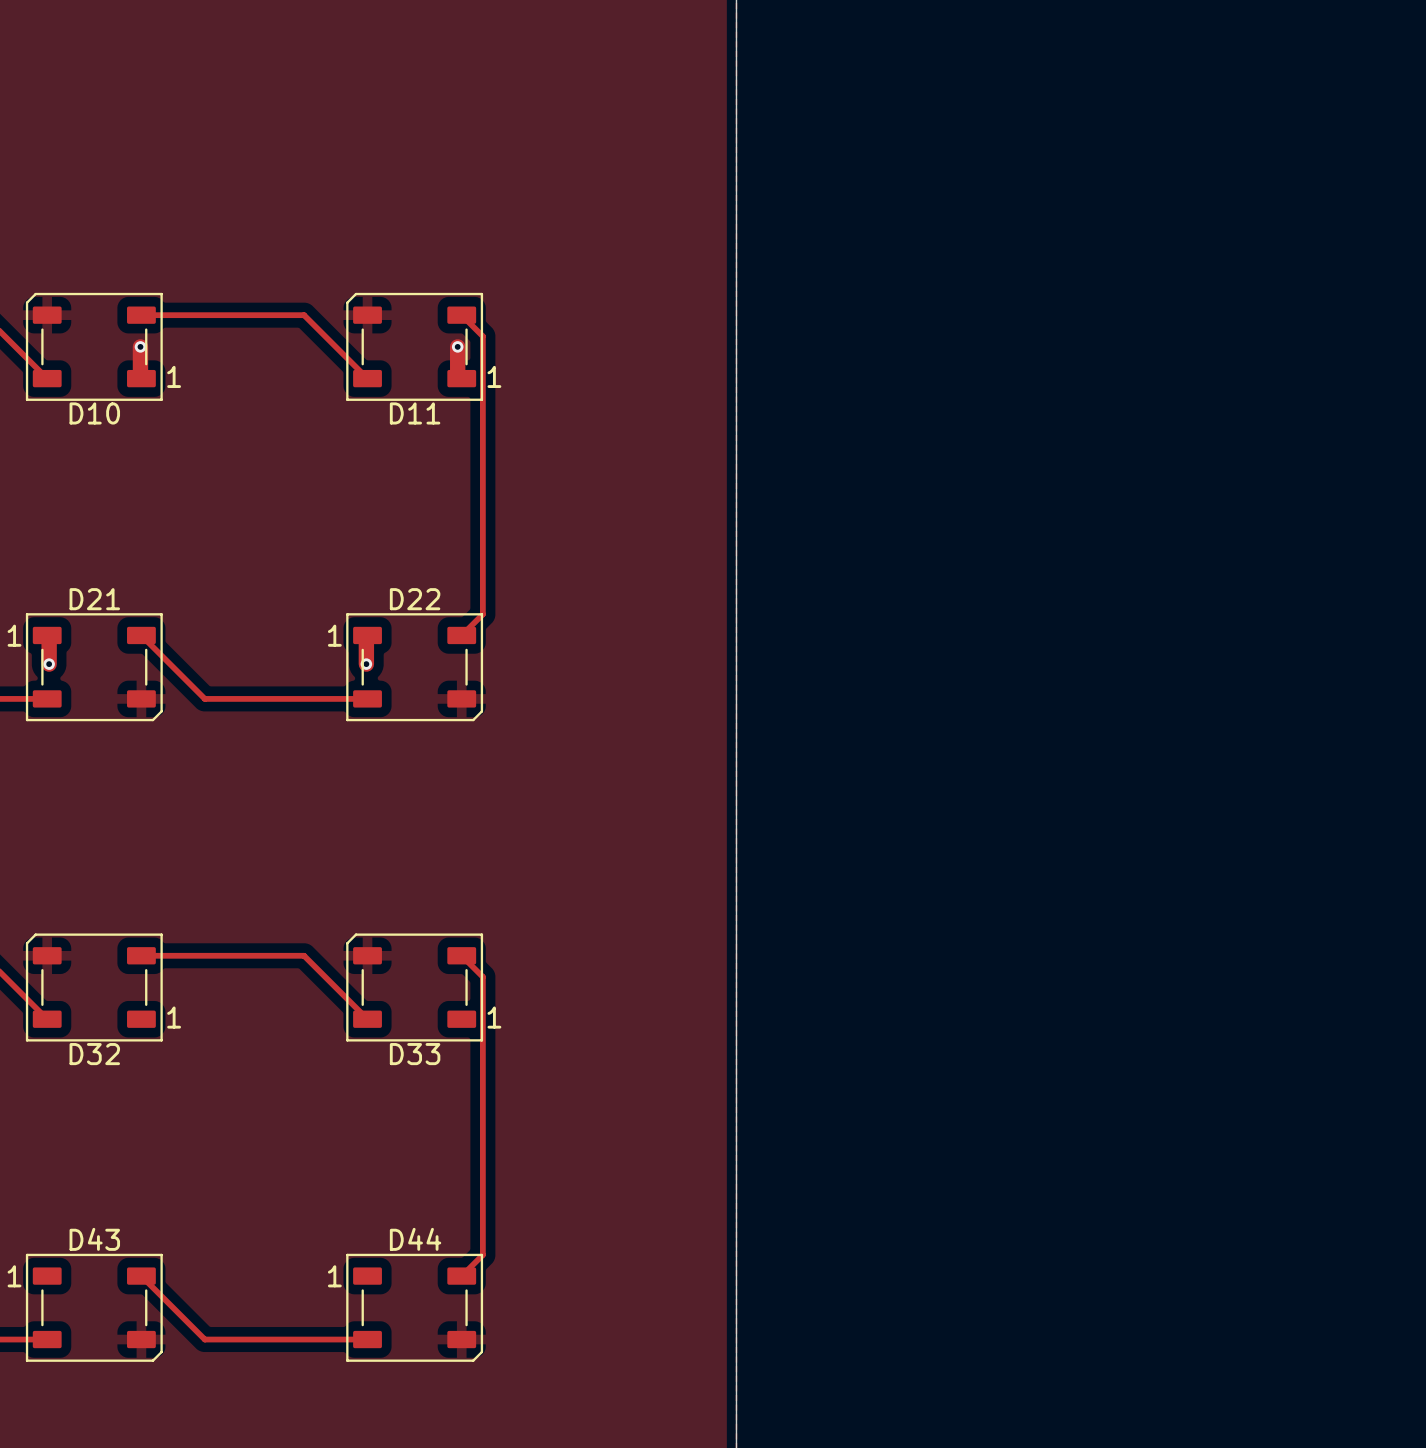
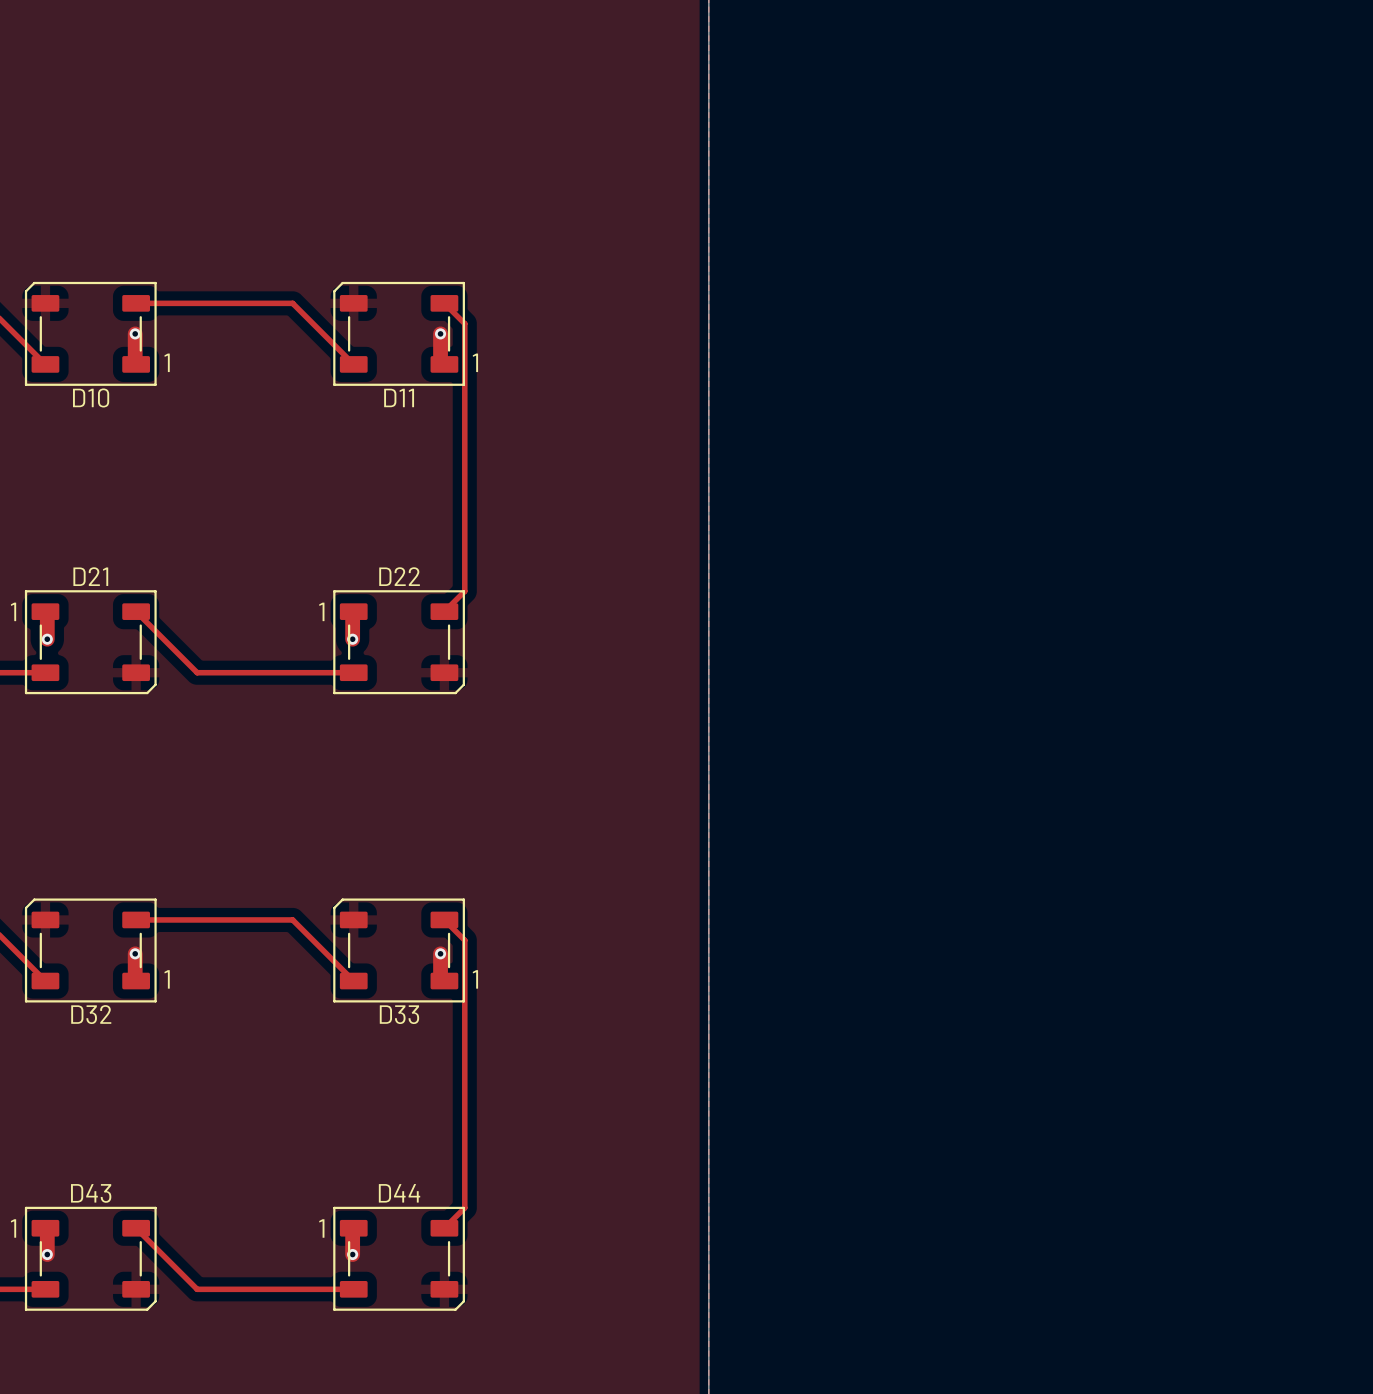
track: none -> (135, 953) (136, 981)
via: none -> (135, 953)
track: none -> (440, 953) (440, 977) (444, 981)
via: none -> (440, 953)
track: none -> (45, 1228) (47, 1230) (47, 1254)
track: none -> (353, 1228) (352, 1254)
via: none -> (47, 1254)
via: none -> (352, 1254)

